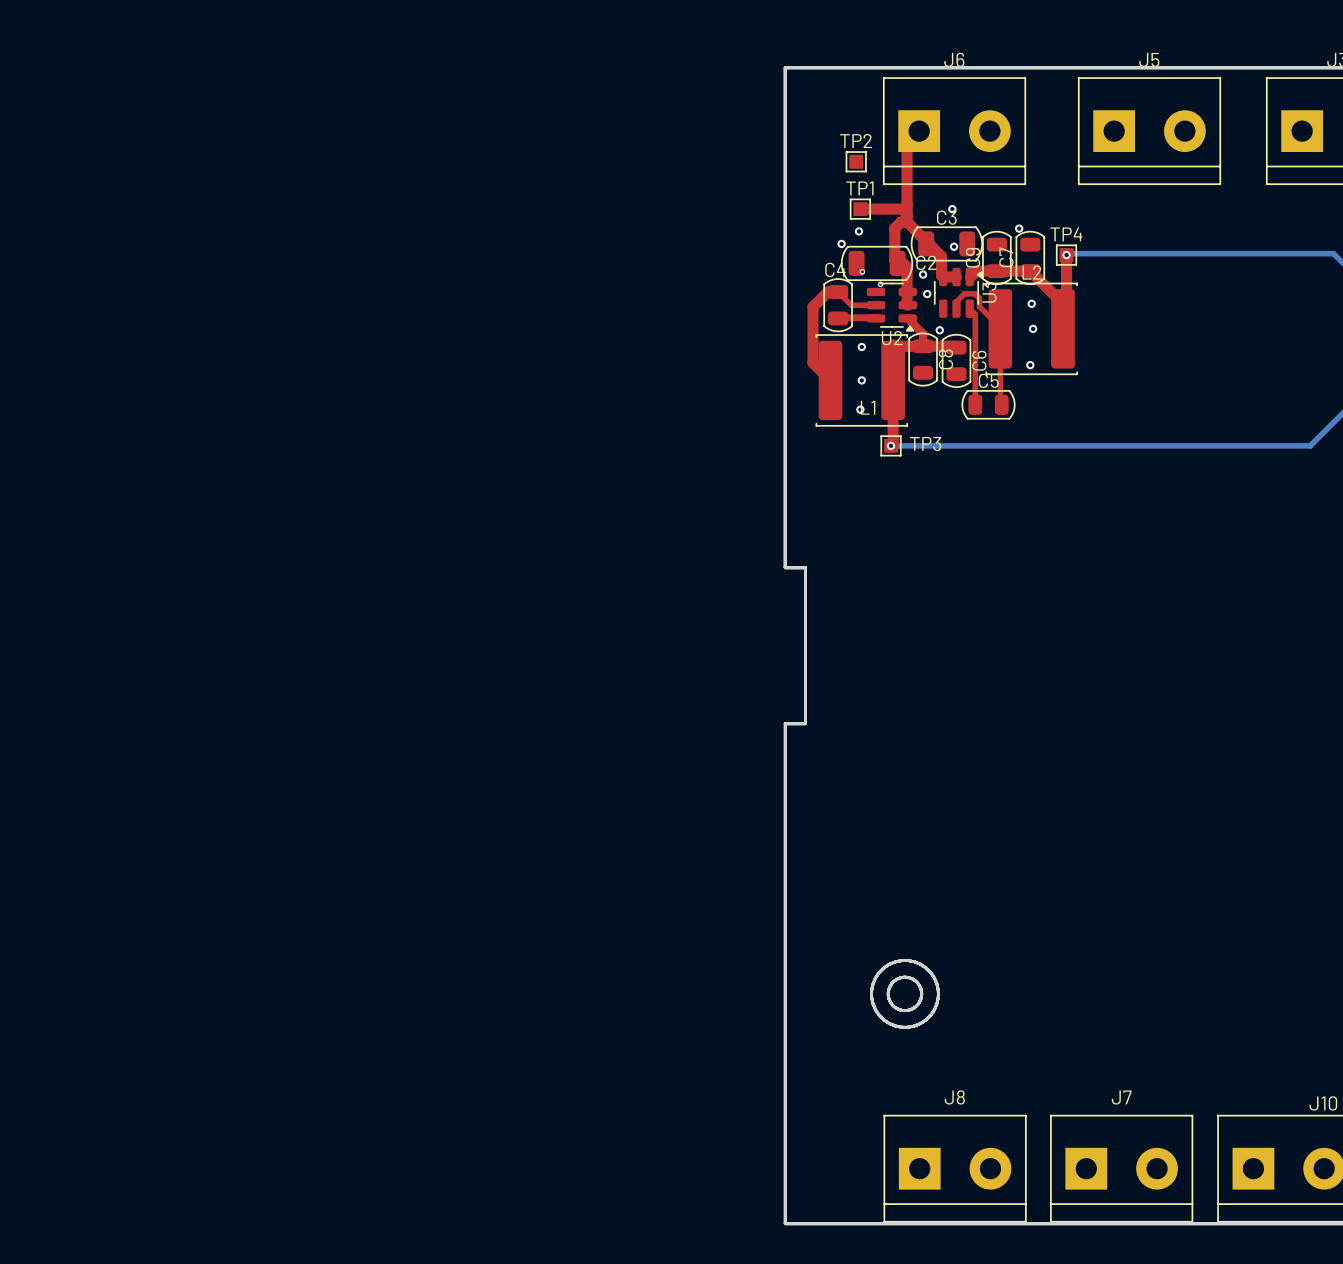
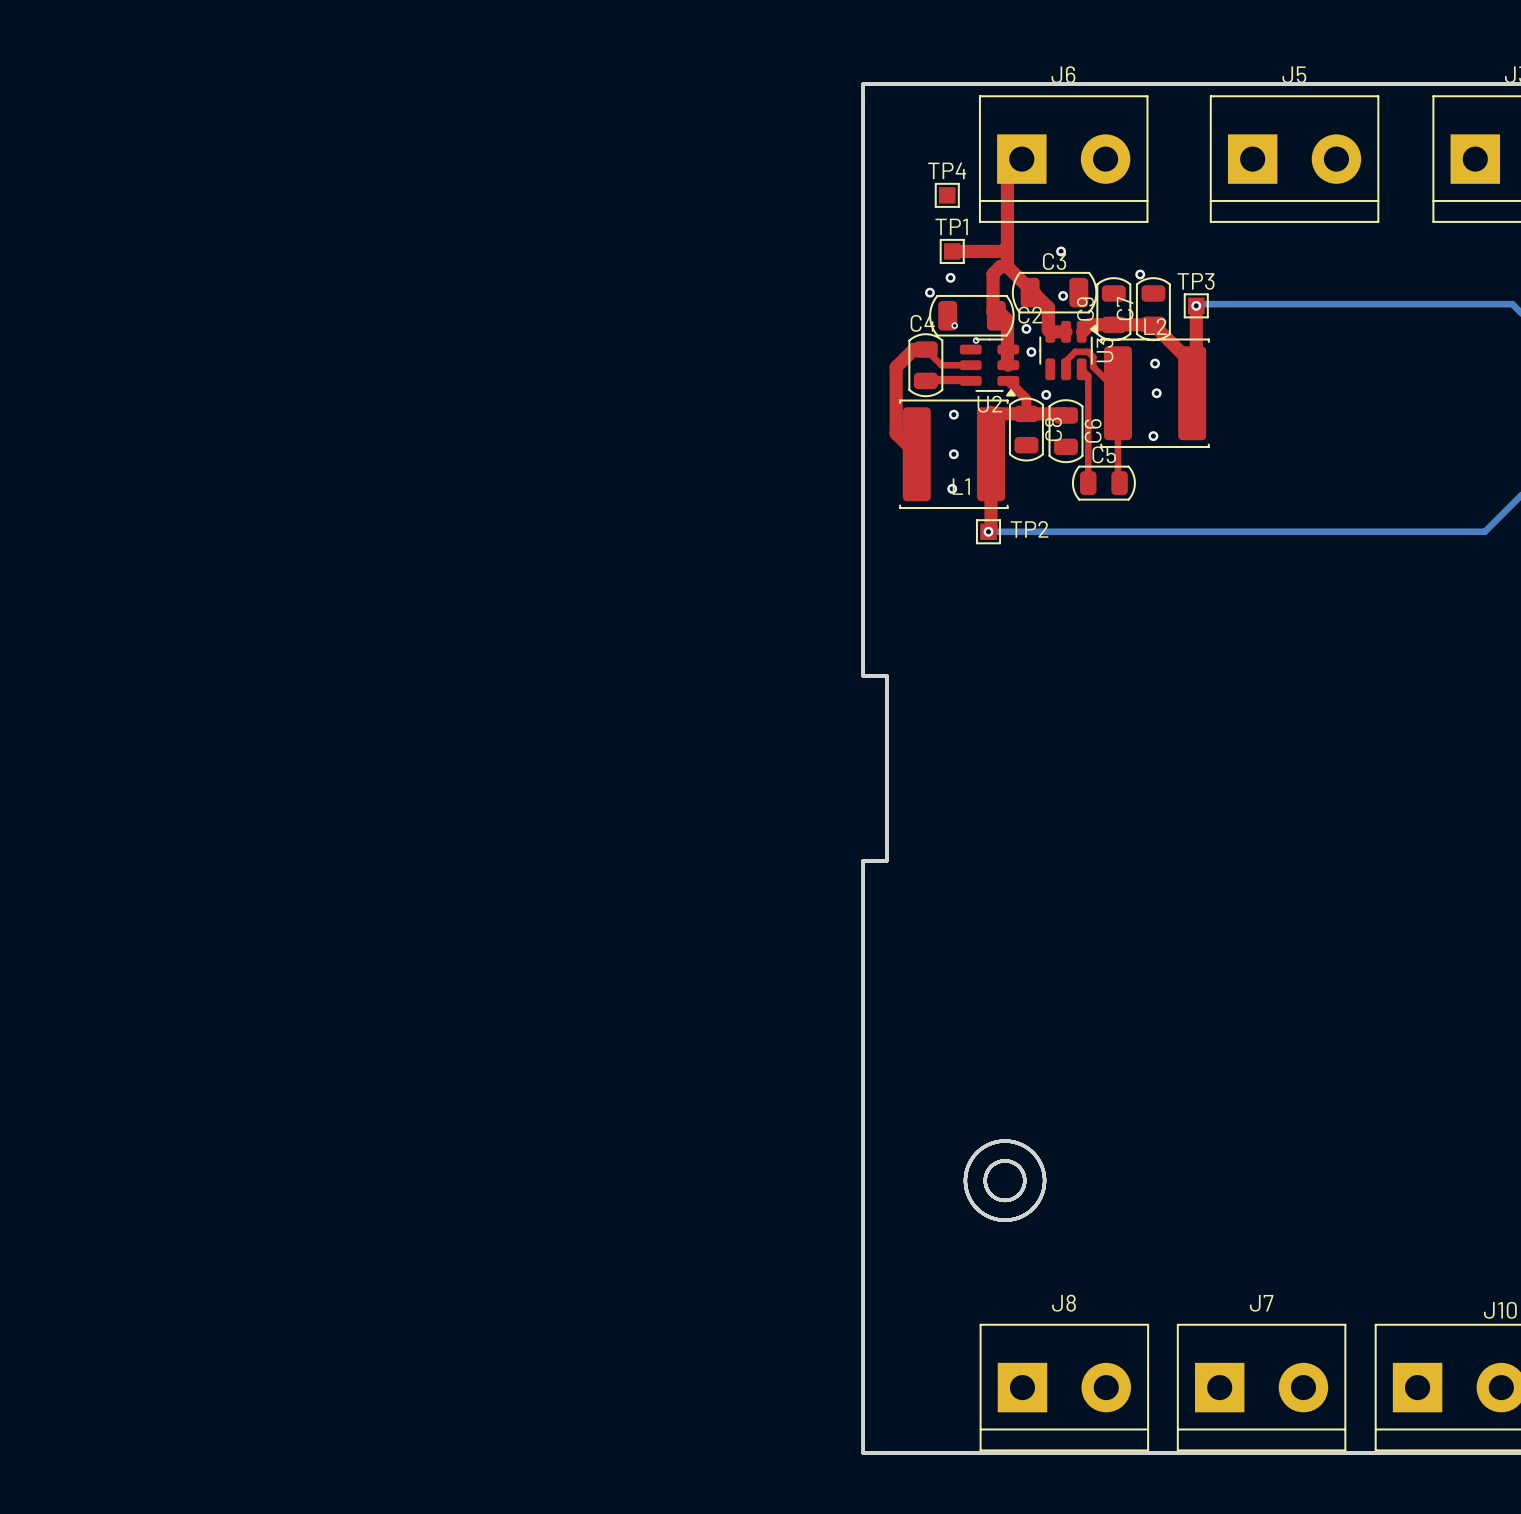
TP2 name: TP2 (856, 141) -> TP4 (947, 170)
TP4 name: TP4 (1066, 234) -> TP3 (1196, 281)
TP3 name: TP3 (925, 444) -> TP2 (1029, 529)

